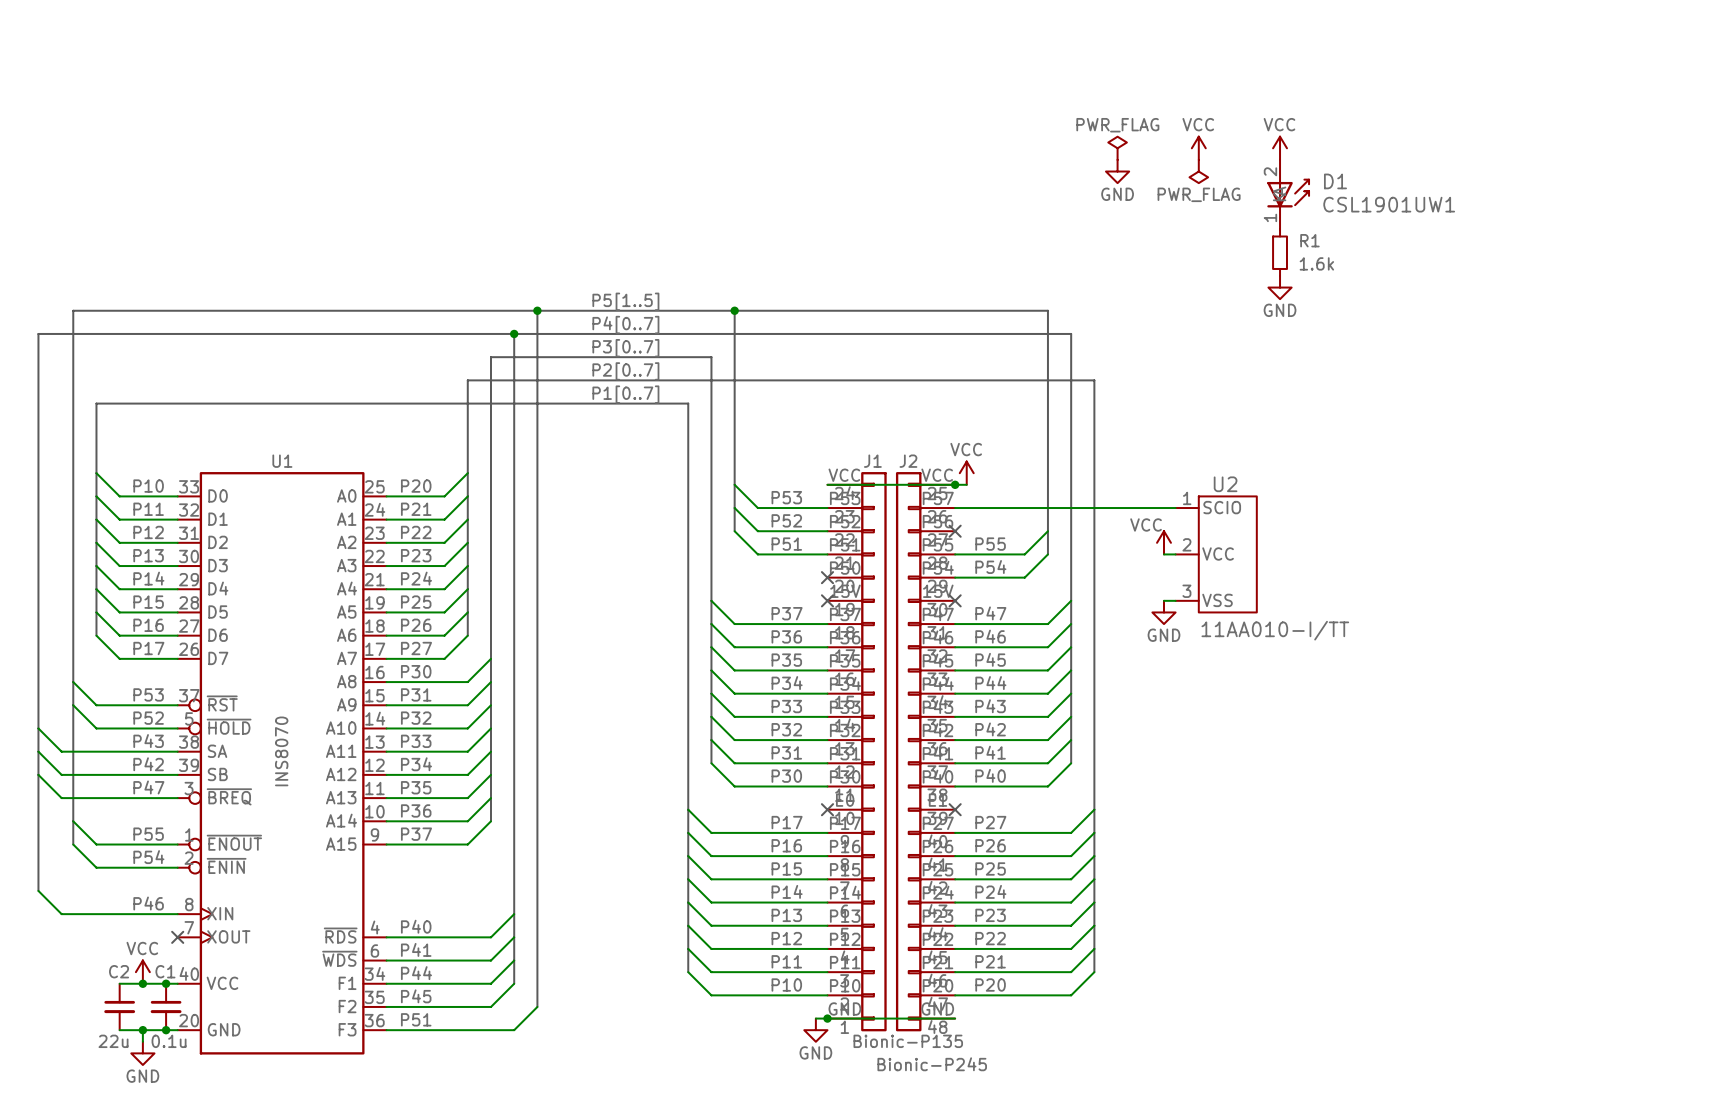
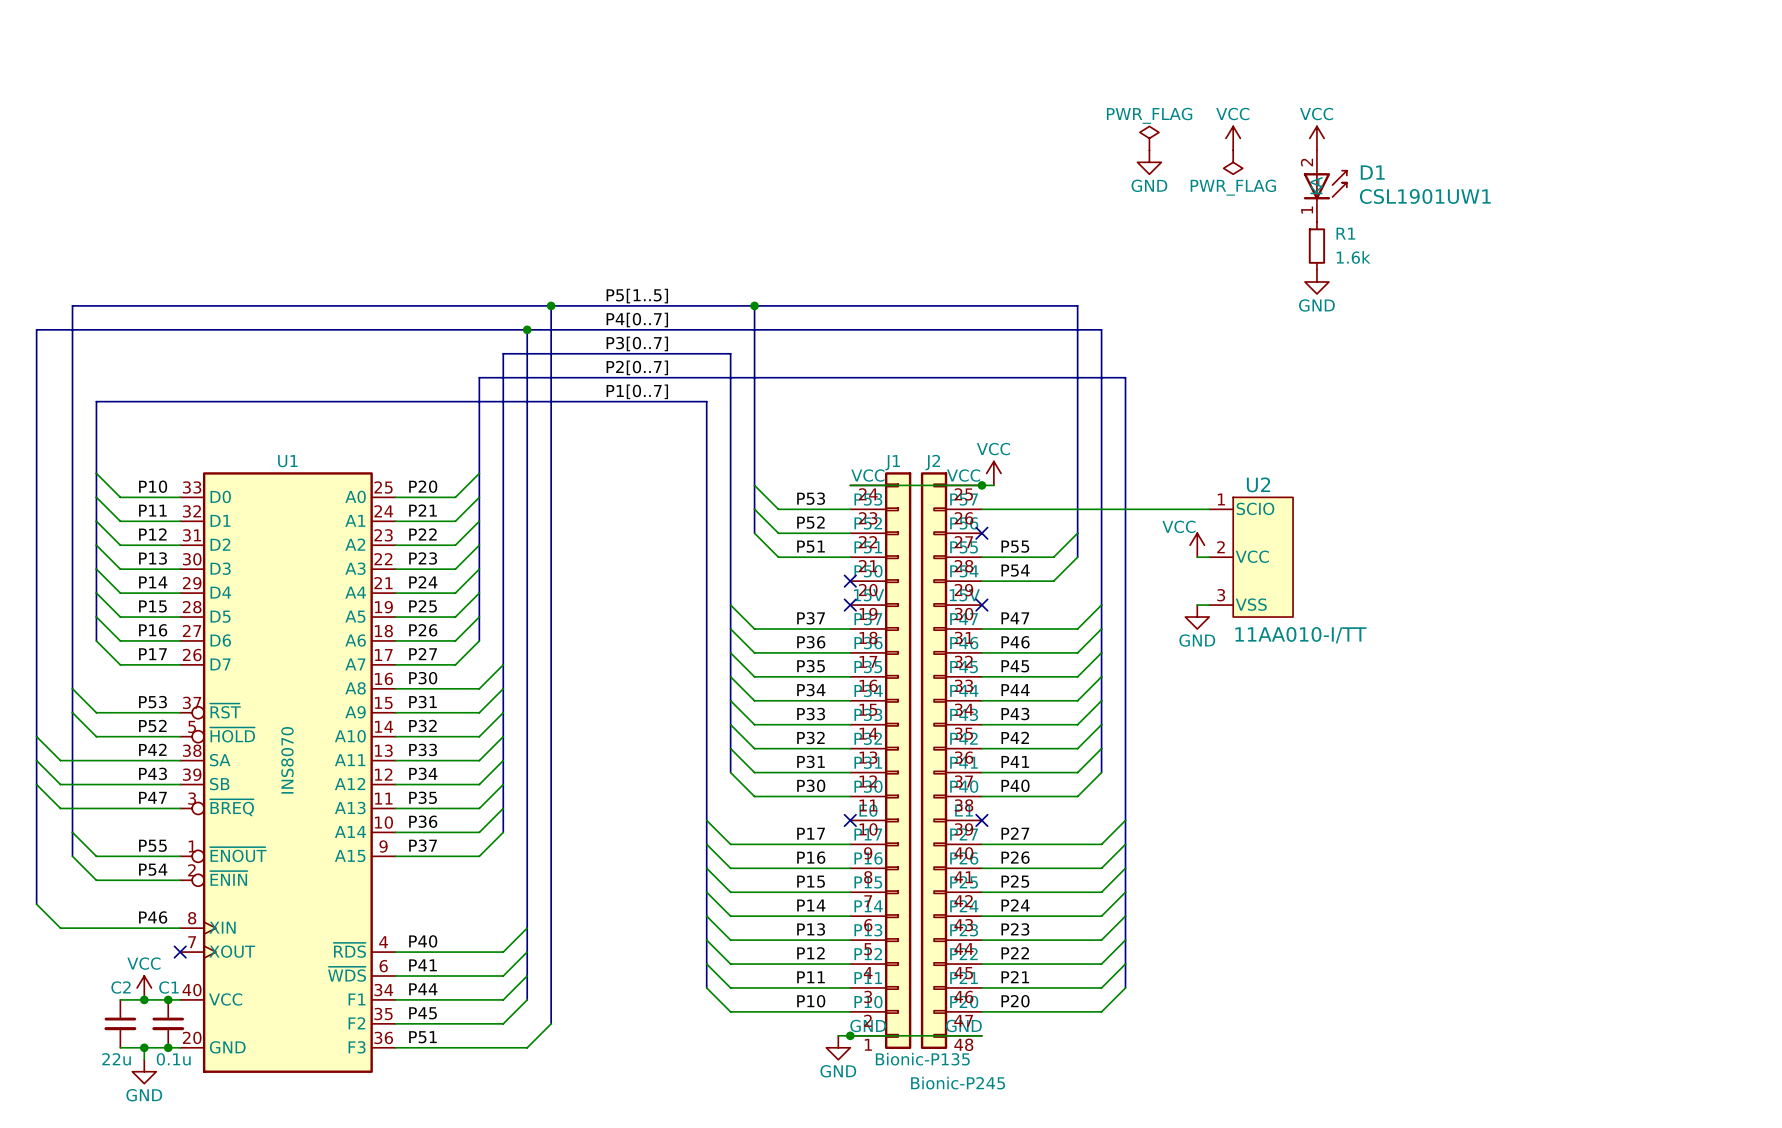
label: P43 (148, 741) -> P42 (152, 749)
label: P42 (148, 764) -> P43 (152, 773)

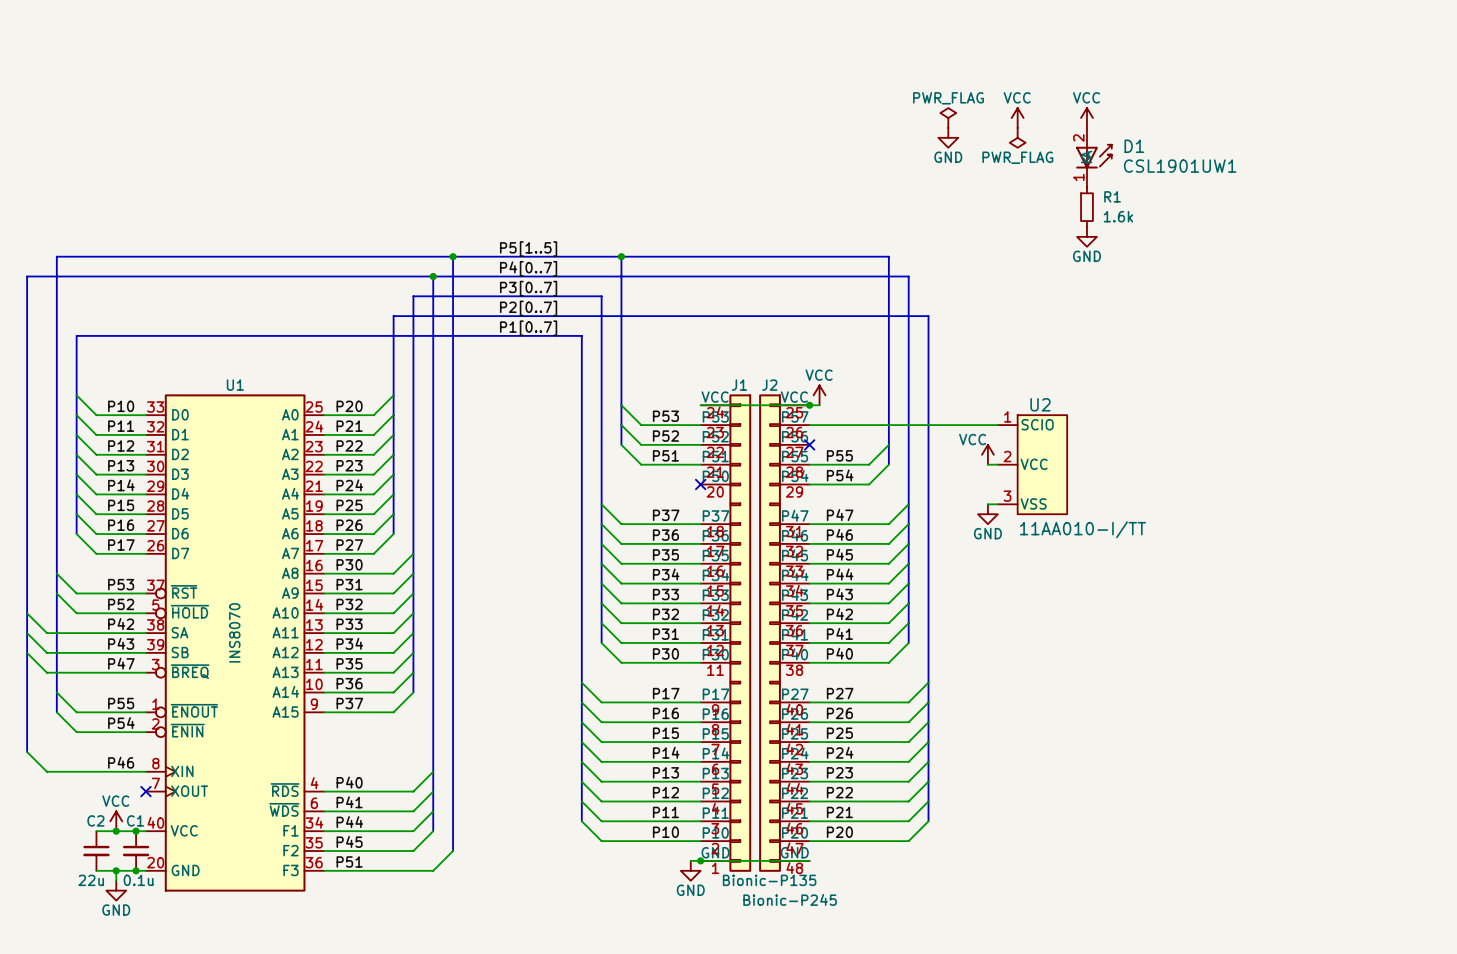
J1 symbol: [850, 472, 912, 1049] -> [700, 394, 752, 872]
J2 symbol: [920, 472, 982, 1049] -> [759, 394, 810, 872]
no-connect mark: (850, 605) -> none
no-connect mark: (981, 605) -> none
no-connect mark: (850, 820) -> none
no-connect mark: (981, 820) -> none

